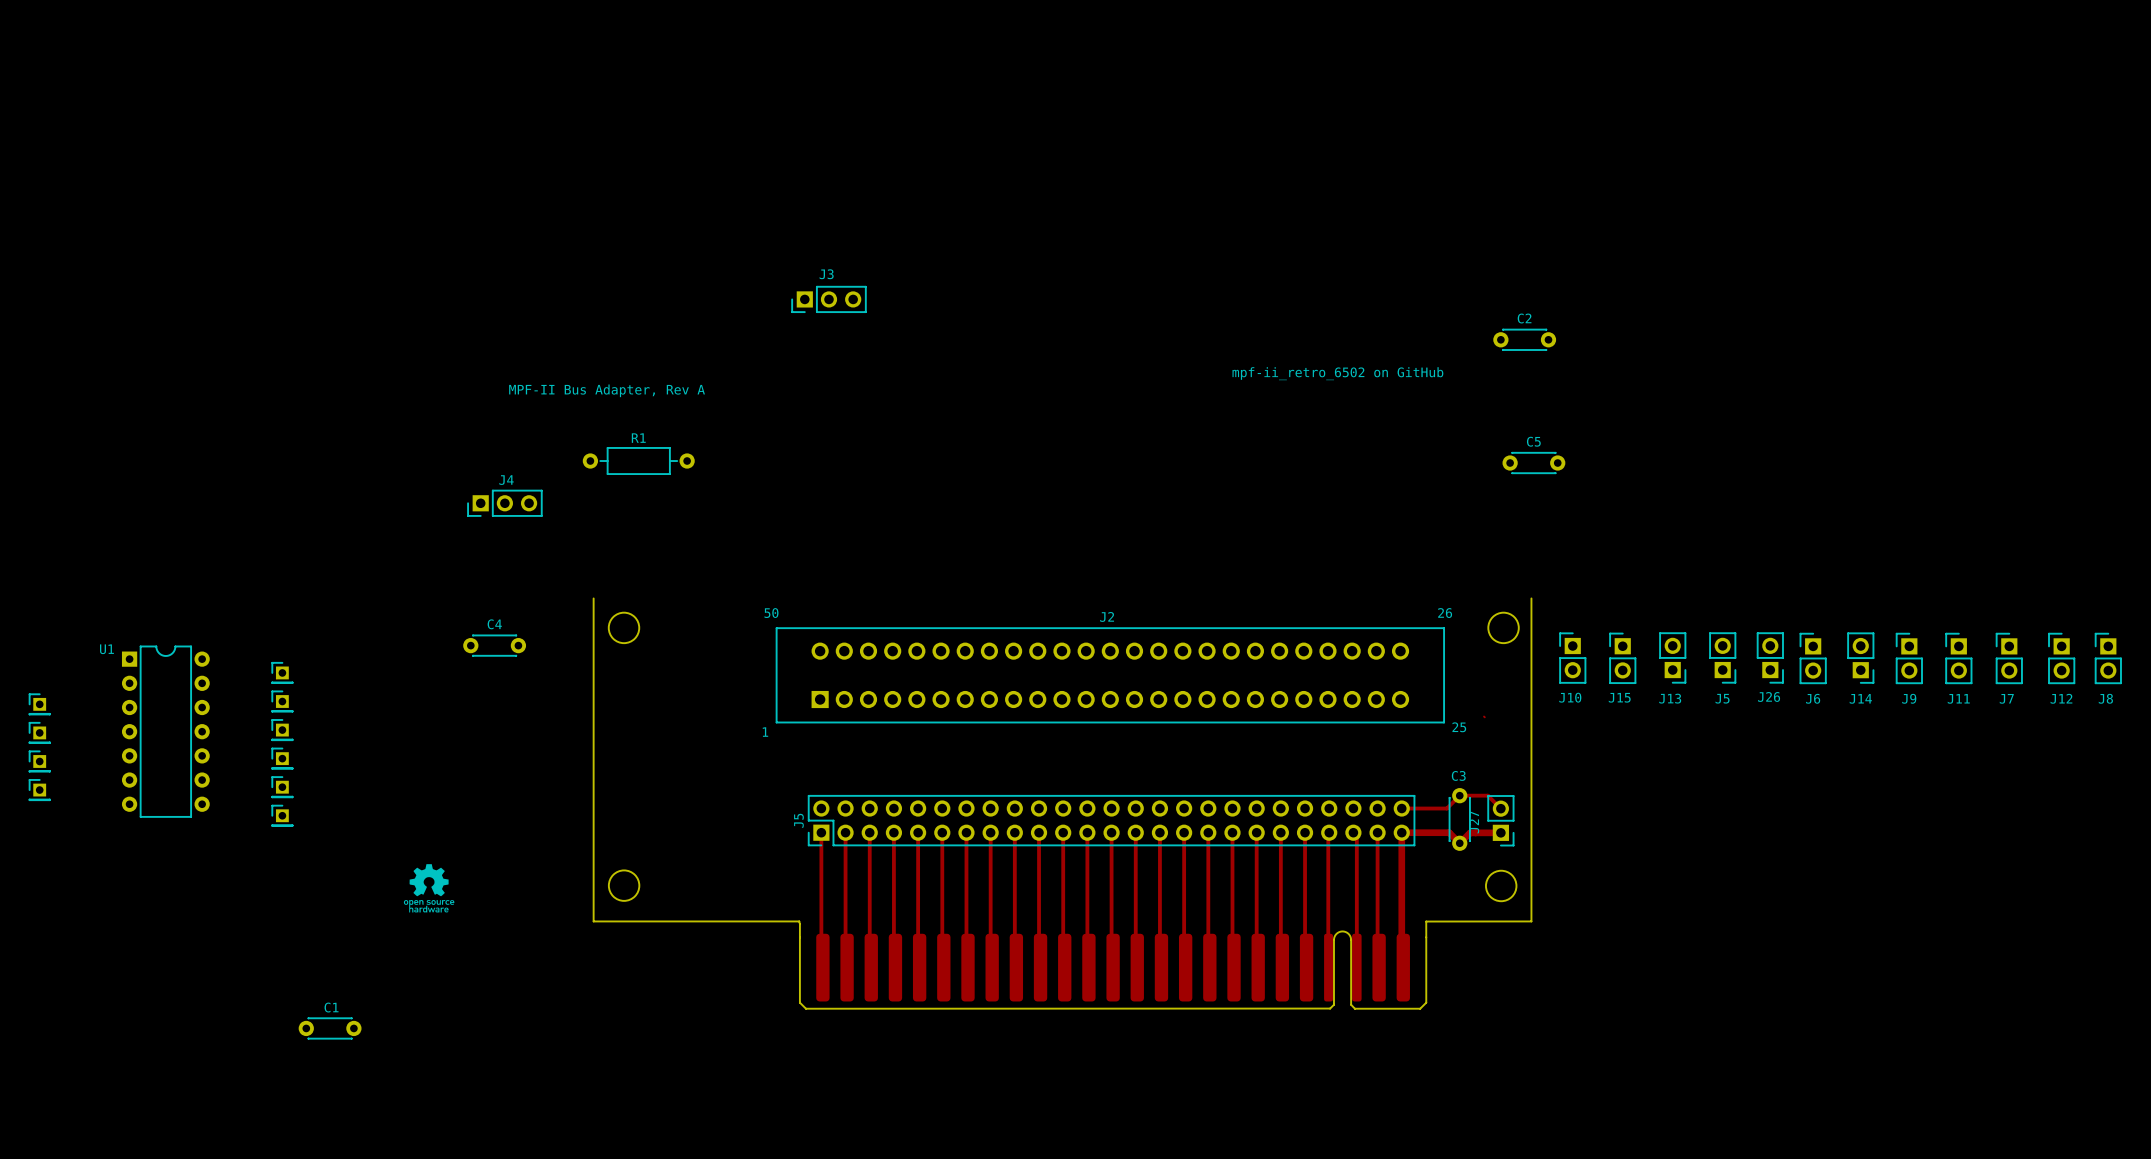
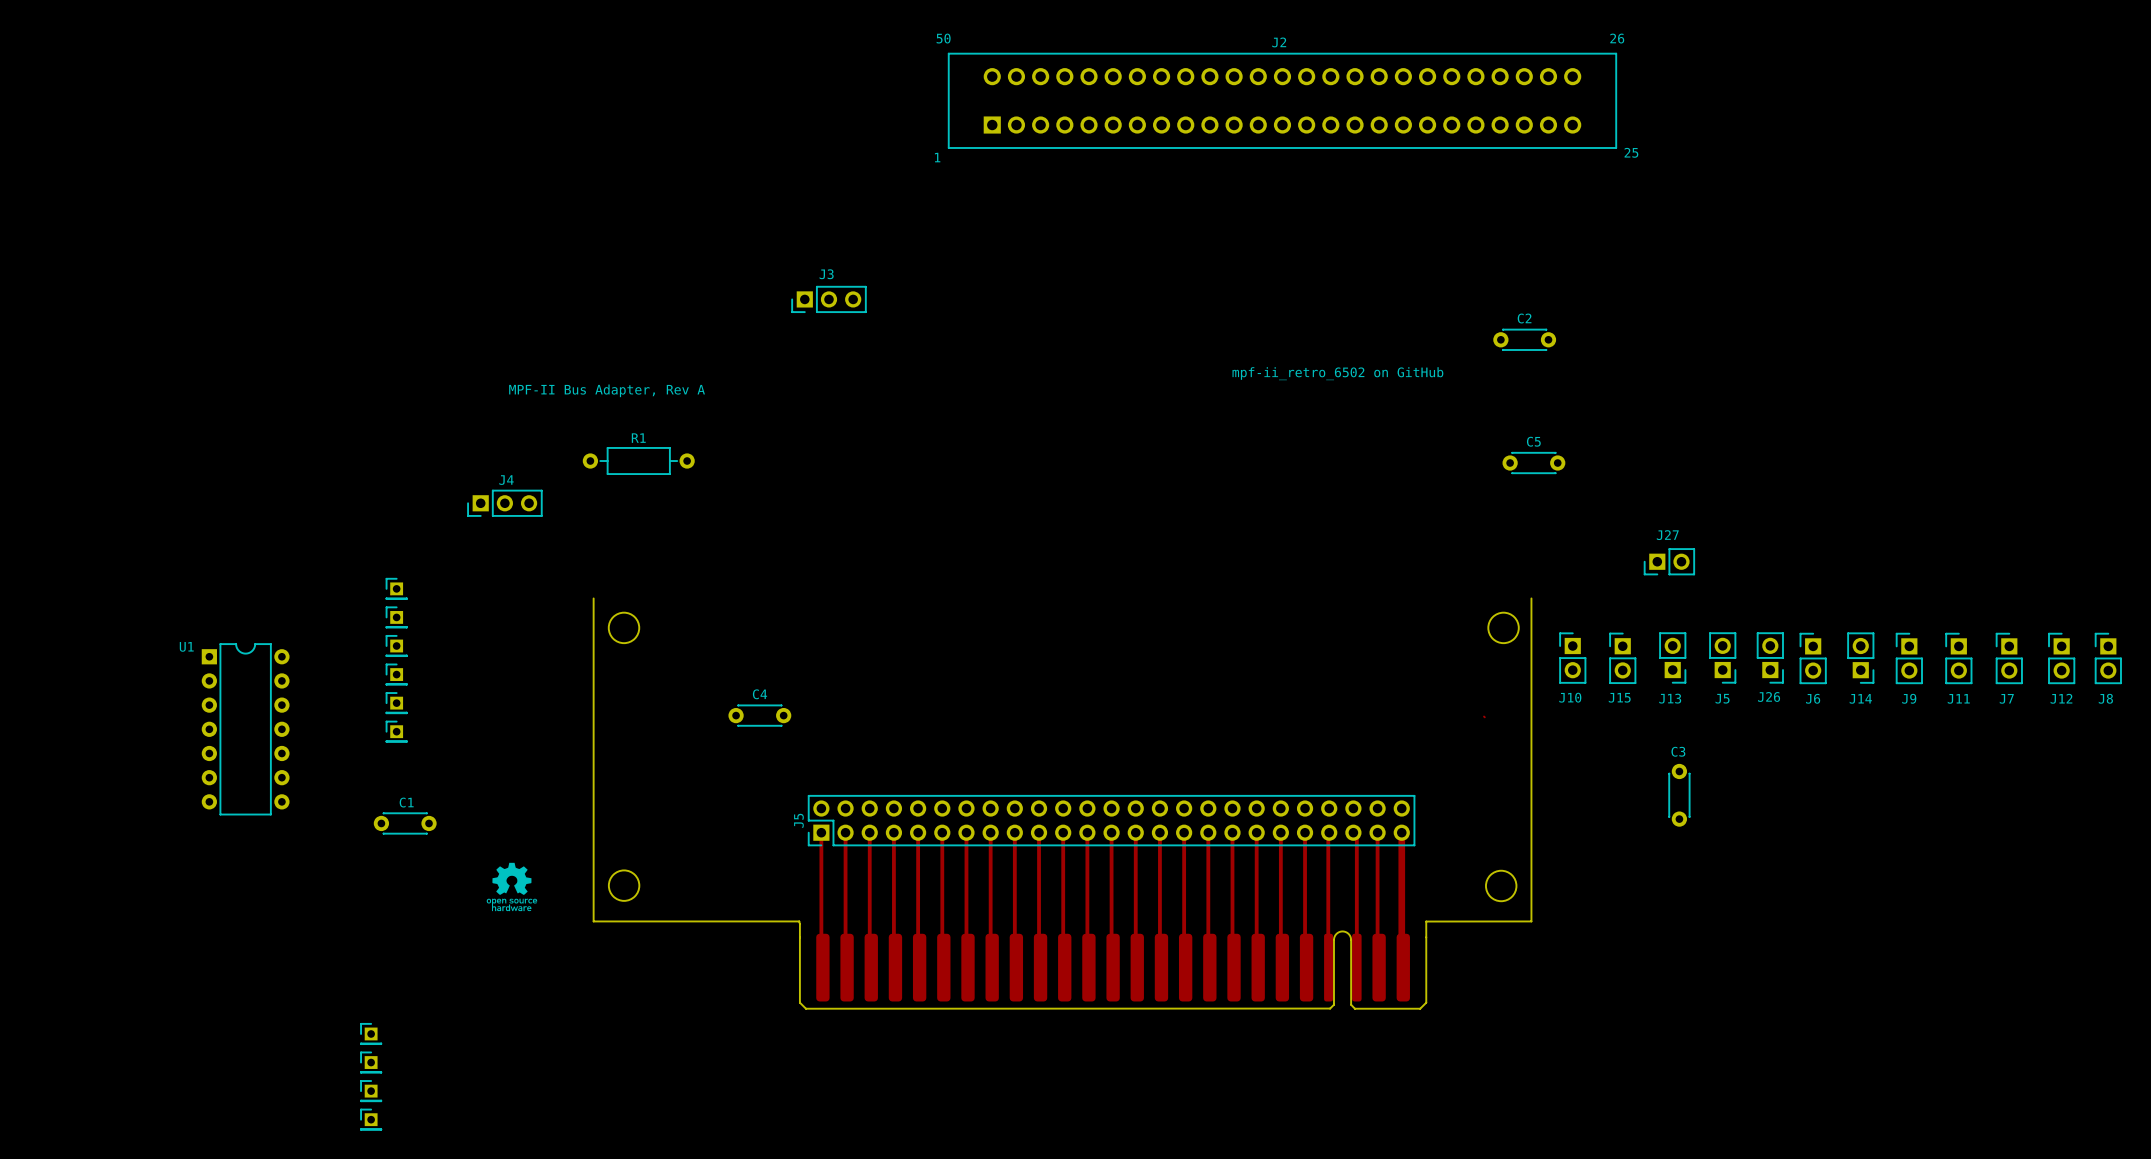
part: none -> (396, 588)
part: none -> (396, 617)
C4 position: (494, 645) -> (759, 715)
part: none -> (396, 646)
part: (282, 672) -> none
part: none -> (396, 674)
J2 position: (1110, 675) -> (1282, 100)
part: (282, 701) -> none
part: none -> (396, 703)
part: (39, 704) -> none
part: (282, 730) -> none
U1 position: (165, 731) -> (245, 729)
part: none -> (396, 731)
part: (39, 732) -> none
part: (282, 758) -> none
part: (39, 761) -> none
part: (282, 787) -> none
part: (39, 790) -> none
track: (1401, 808) (1446, 808) (1459, 795) (1487, 795) (1500, 808) -> none
part: (282, 815) -> none
C3 position: (1459, 819) -> (1679, 795)
J27 rotation: 0° (1500, 820) -> 90° clockwise (1669, 561)
J27 position: (1500, 820) -> (1669, 561)
track: (1401, 832) (1449, 832) (1459, 843) (1470, 832) (1475, 832) -> none
track: (1475, 832) (1500, 832) -> none
drawing position: (429, 888) -> (511, 886)
C1 position: (330, 1028) -> (405, 823)
part: none -> (371, 1033)
part: none -> (371, 1062)
part: none -> (371, 1091)
part: none -> (371, 1119)

